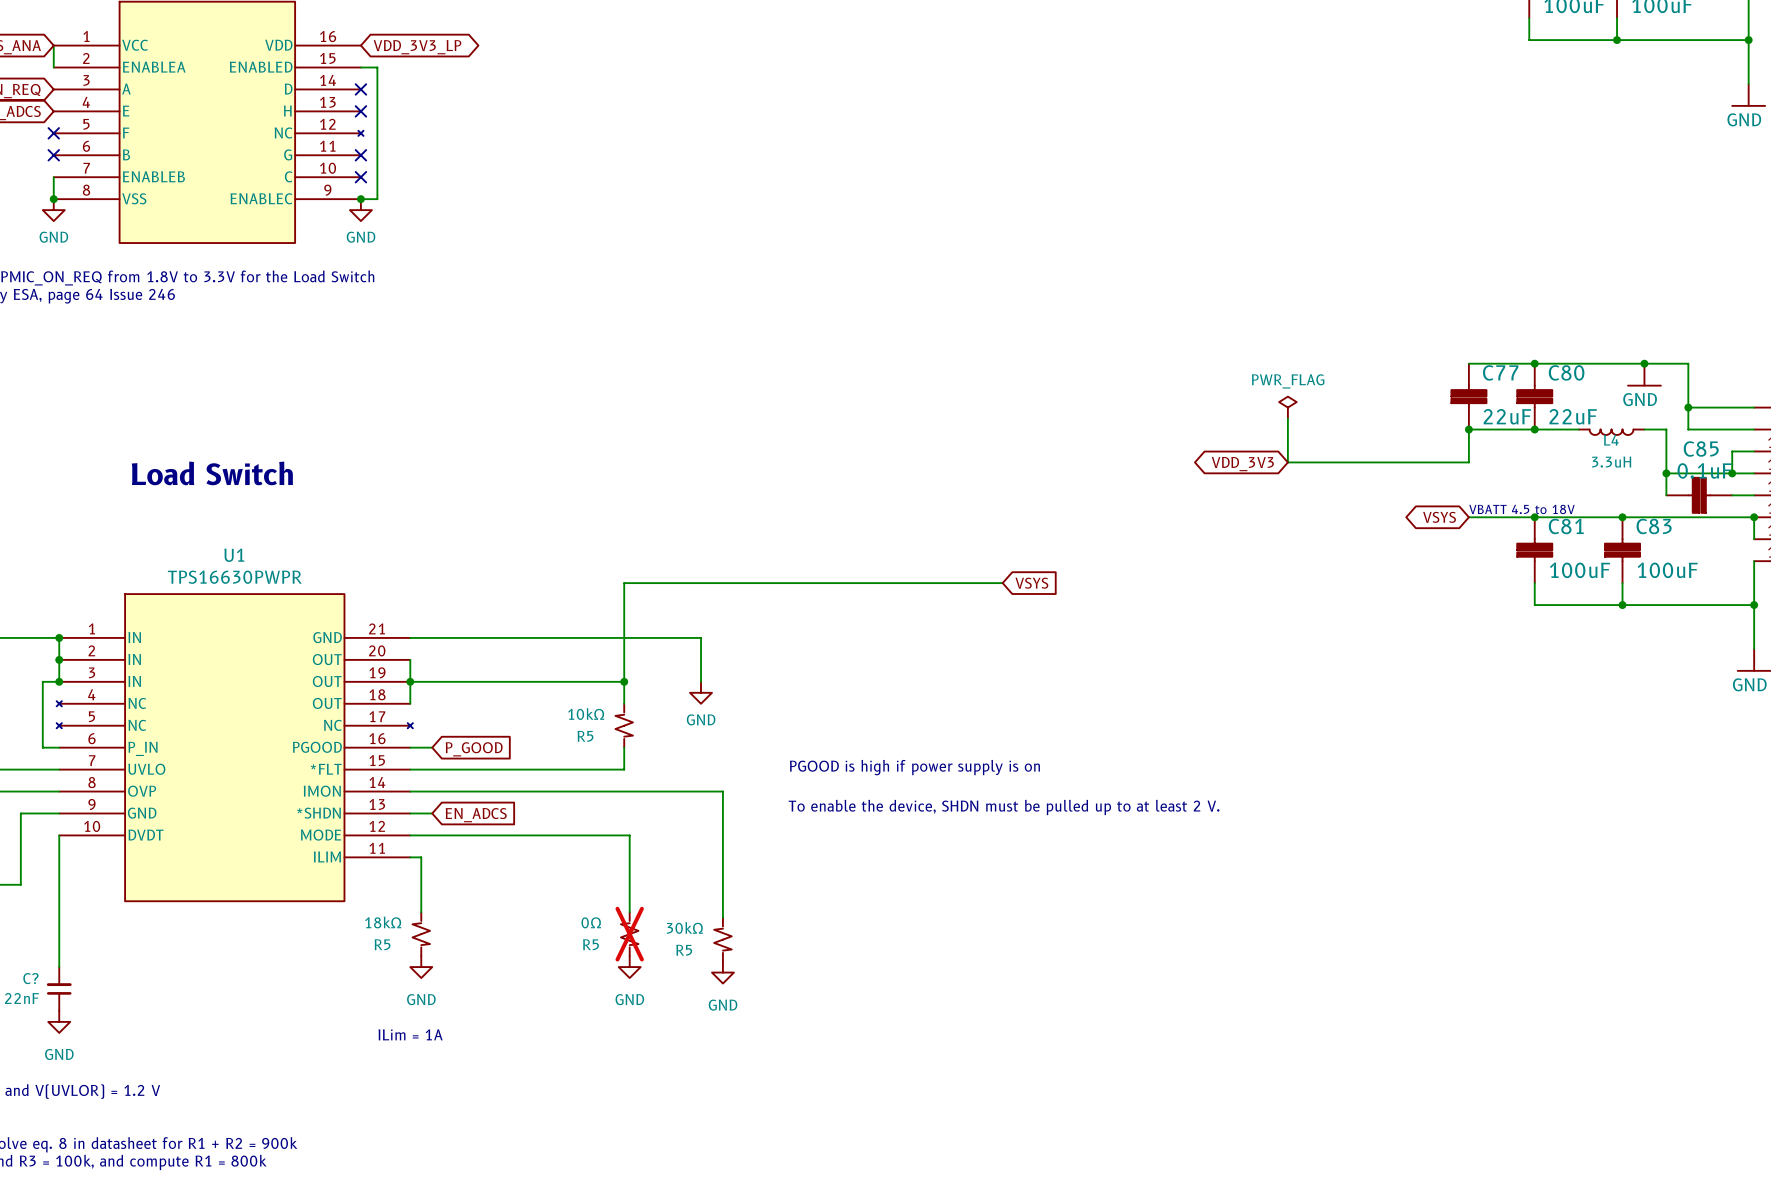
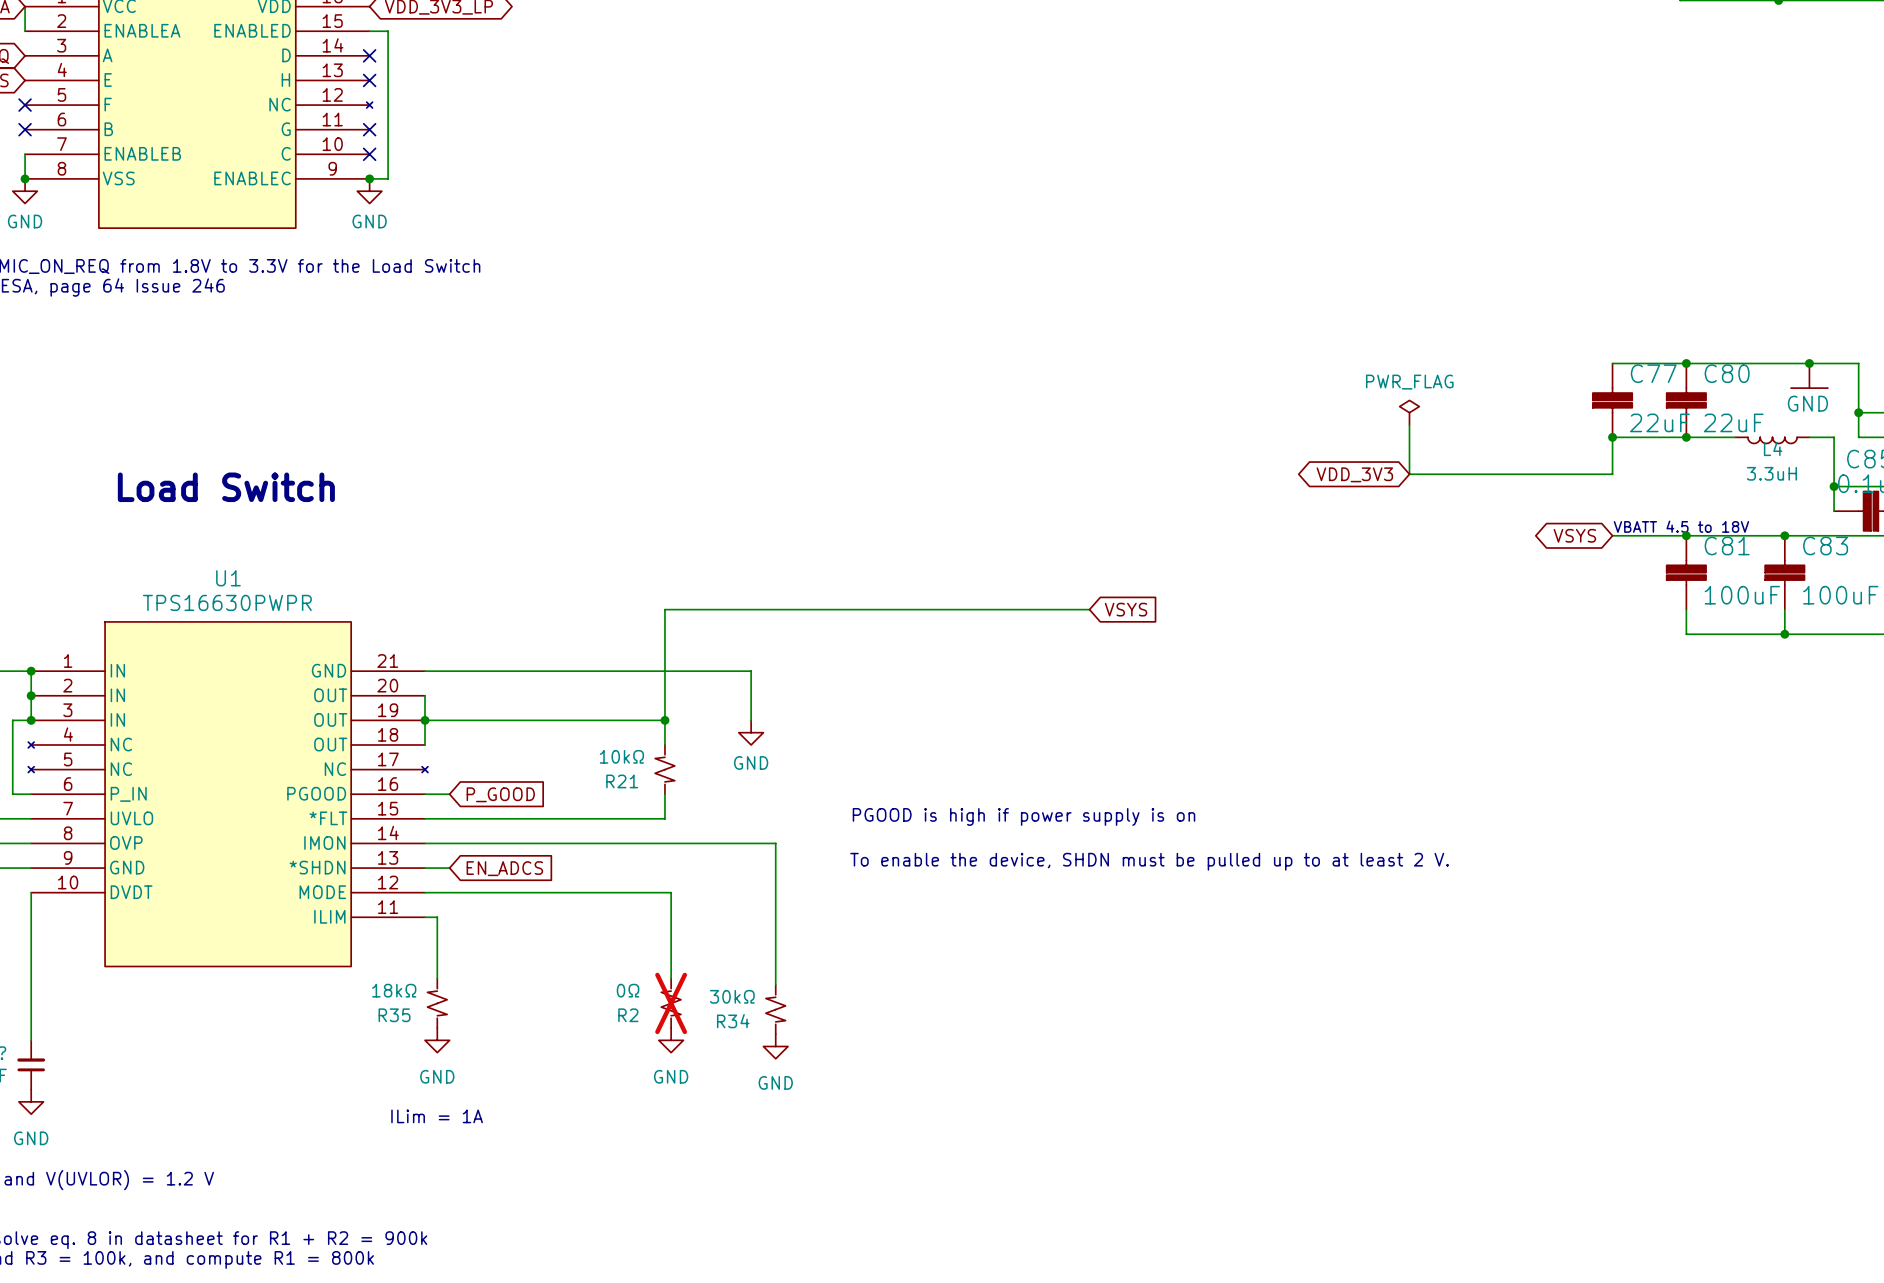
R5 name: R5 (585, 736) -> R21 (622, 781)
R5 name: R5 (382, 944) -> R35 (394, 1015)
R5 name: R5 (590, 944) -> R2 (628, 1015)
R5 name: R5 (684, 950) -> R34 (733, 1021)

